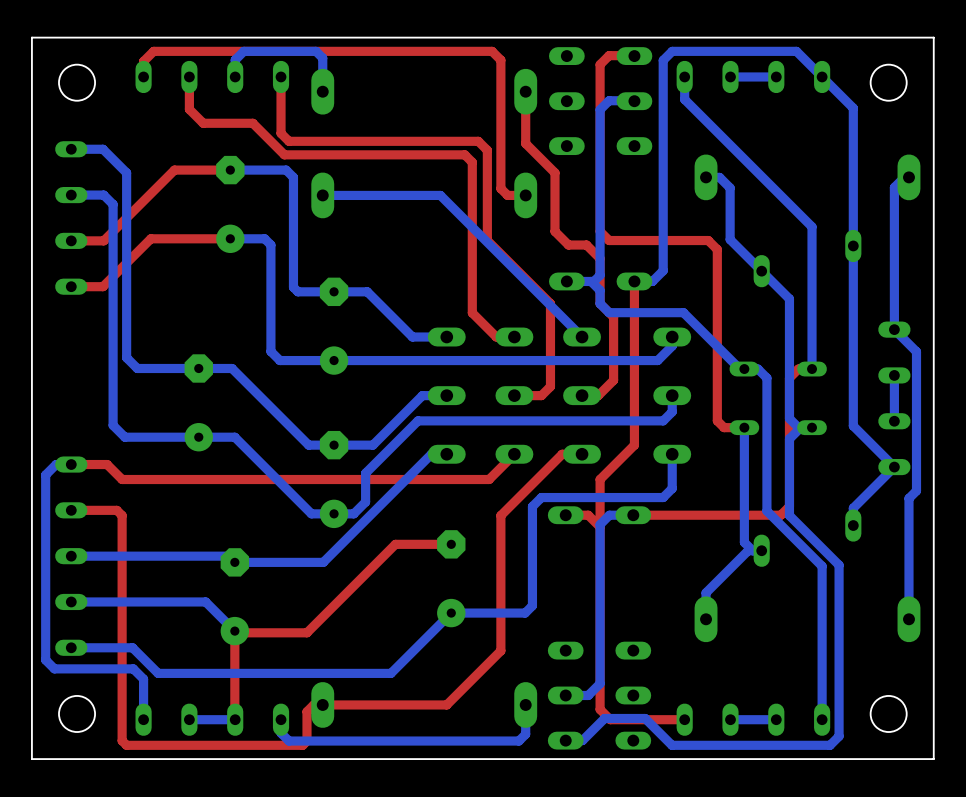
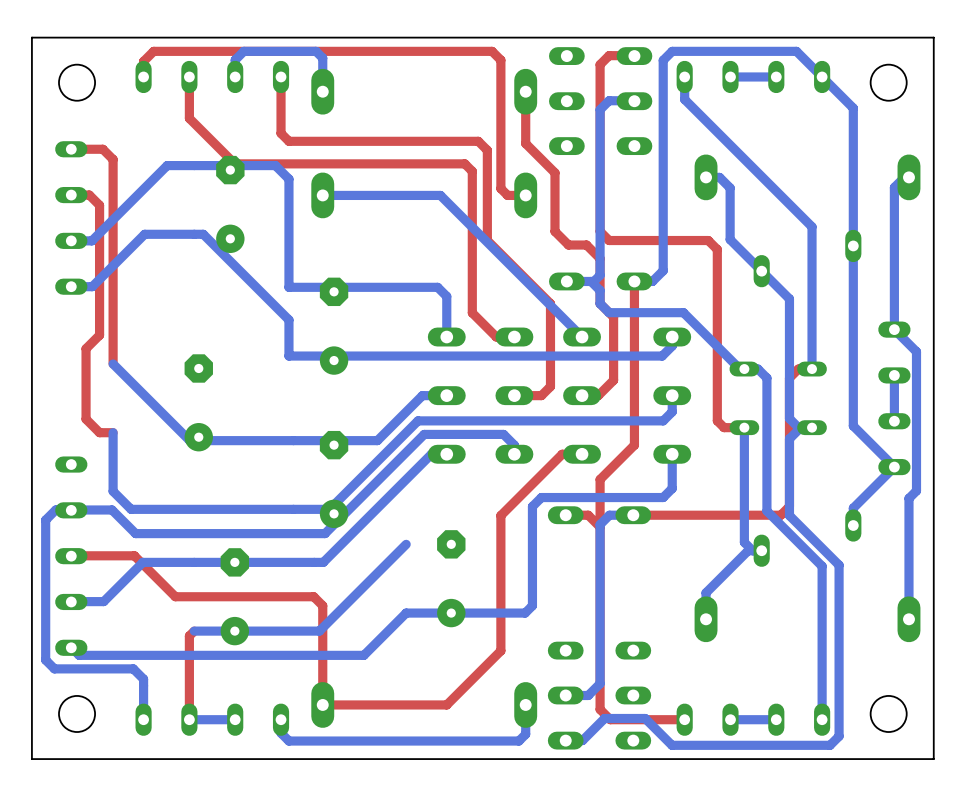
top track: (189, 109) (203, 123) (252, 123) (284, 154) (464, 154) (472, 162) (472, 171) -> (189, 109) (189, 118) (234, 163) (464, 163) (472, 171)
bottom track: (71, 149) (103, 149) (126, 172) (126, 357) (137, 368) (232, 368) (308, 445) (372, 445) (377, 440) -> (113, 363) (189, 440) (377, 440)
top track: none -> (71, 149) (102, 149) (113, 159) (113, 363)
bottom track: (230, 170) (286, 170) (293, 177) (293, 287) (297, 291) (367, 291) (412, 337) (446, 337) -> (71, 240) (91, 240) (167, 165) (275, 165) (288, 179) (288, 287) (437, 287) (446, 296) (446, 337)
top track: (230, 170) (174, 170) (103, 240) (71, 240) -> none
bottom track: (71, 195) (103, 195) (113, 204) (113, 425) (124, 437) (234, 437) (311, 513) (353, 513) (365, 502) (365, 473) -> (113, 432) (113, 491) (131, 509) (329, 509) (365, 473)
top track: none -> (71, 195) (89, 195) (99, 205) (99, 335) (86, 348) (86, 419) (99, 432) (113, 432)
bottom track: (230, 238) (264, 238) (270, 245) (270, 351) (279, 360) (657, 360) (662, 356) -> (71, 286) (92, 286) (144, 234) (203, 234) (288, 319) (288, 356) (662, 356)
top track: (230, 238) (150, 238) (103, 286) (71, 286) -> none
top track: (514, 454) (489, 479) (122, 479) (107, 464) (71, 464) -> none
bottom track: (71, 464) (56, 464) (45, 474) (45, 520) -> (514, 454) (514, 445) (503, 434) (424, 434) (325, 533) (135, 533) (112, 509) (55, 509) (45, 520)
top track: (71, 510) (116, 510) (122, 515) (122, 740) (126, 745) (302, 745) (306, 741) (306, 711) (313, 704) (322, 704) -> (71, 555) (134, 555) (175, 596) (313, 596) (322, 605) (322, 704)
bottom track: none -> (406, 544) (319, 631) (194, 631)
top track: (451, 544) (395, 544) (306, 632) (236, 632) (234, 631) (235, 719) -> none
bottom track: (71, 556) (228, 556) (234, 562) -> (71, 601) (103, 601) (142, 562) (234, 562)
bottom track: (71, 601) (205, 601) (234, 631) -> none
bottom track: (451, 613) (390, 673) (158, 673) (132, 647) (71, 647) -> (451, 613) (406, 613) (363, 655) (79, 655) (71, 647)
top track: none -> (194, 631) (189, 635) (189, 719)

